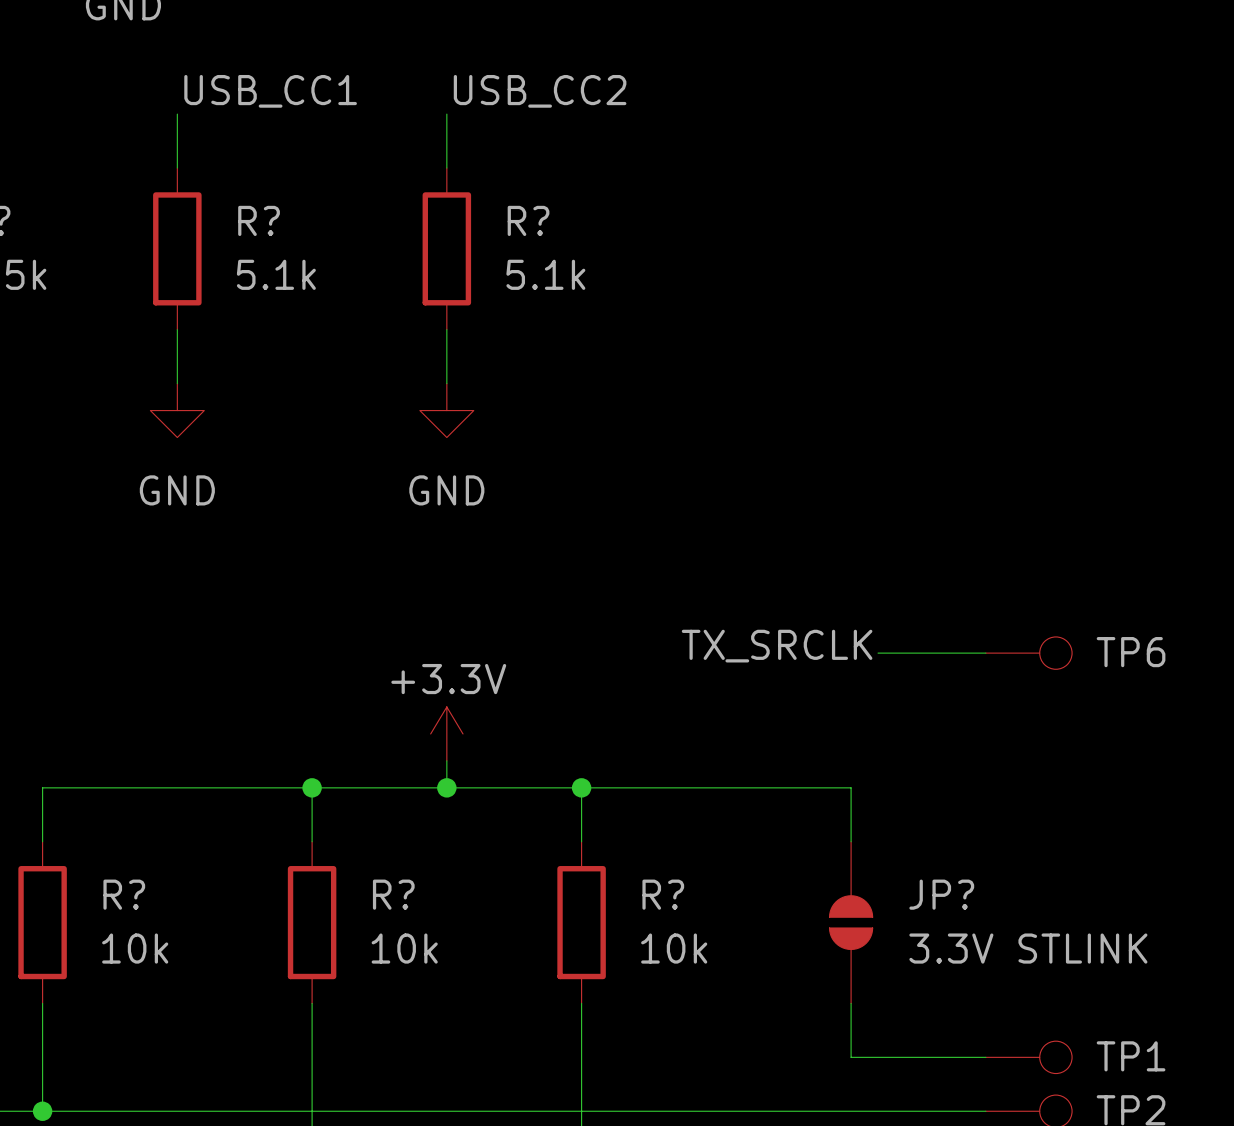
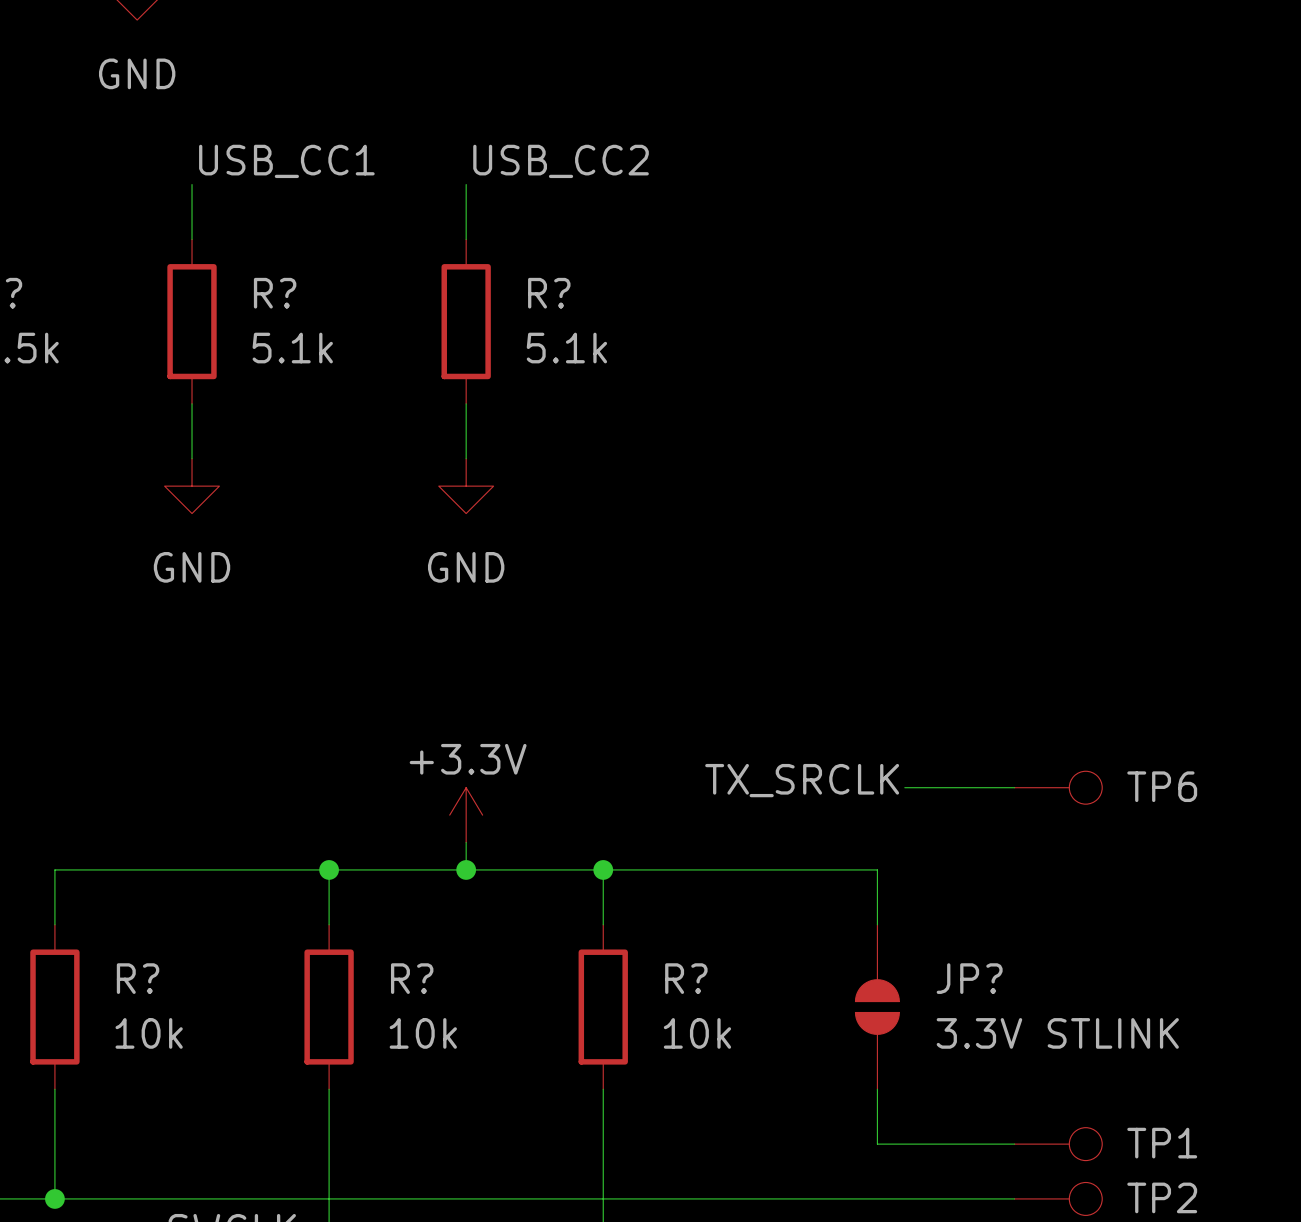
label position: TX_SRCLK (777, 646) -> TX_SRCLK (802, 780)
wire: (878, 653) (985, 653) -> (904, 787) (1014, 787)
TP6 position: (1028, 653) -> (1058, 787)

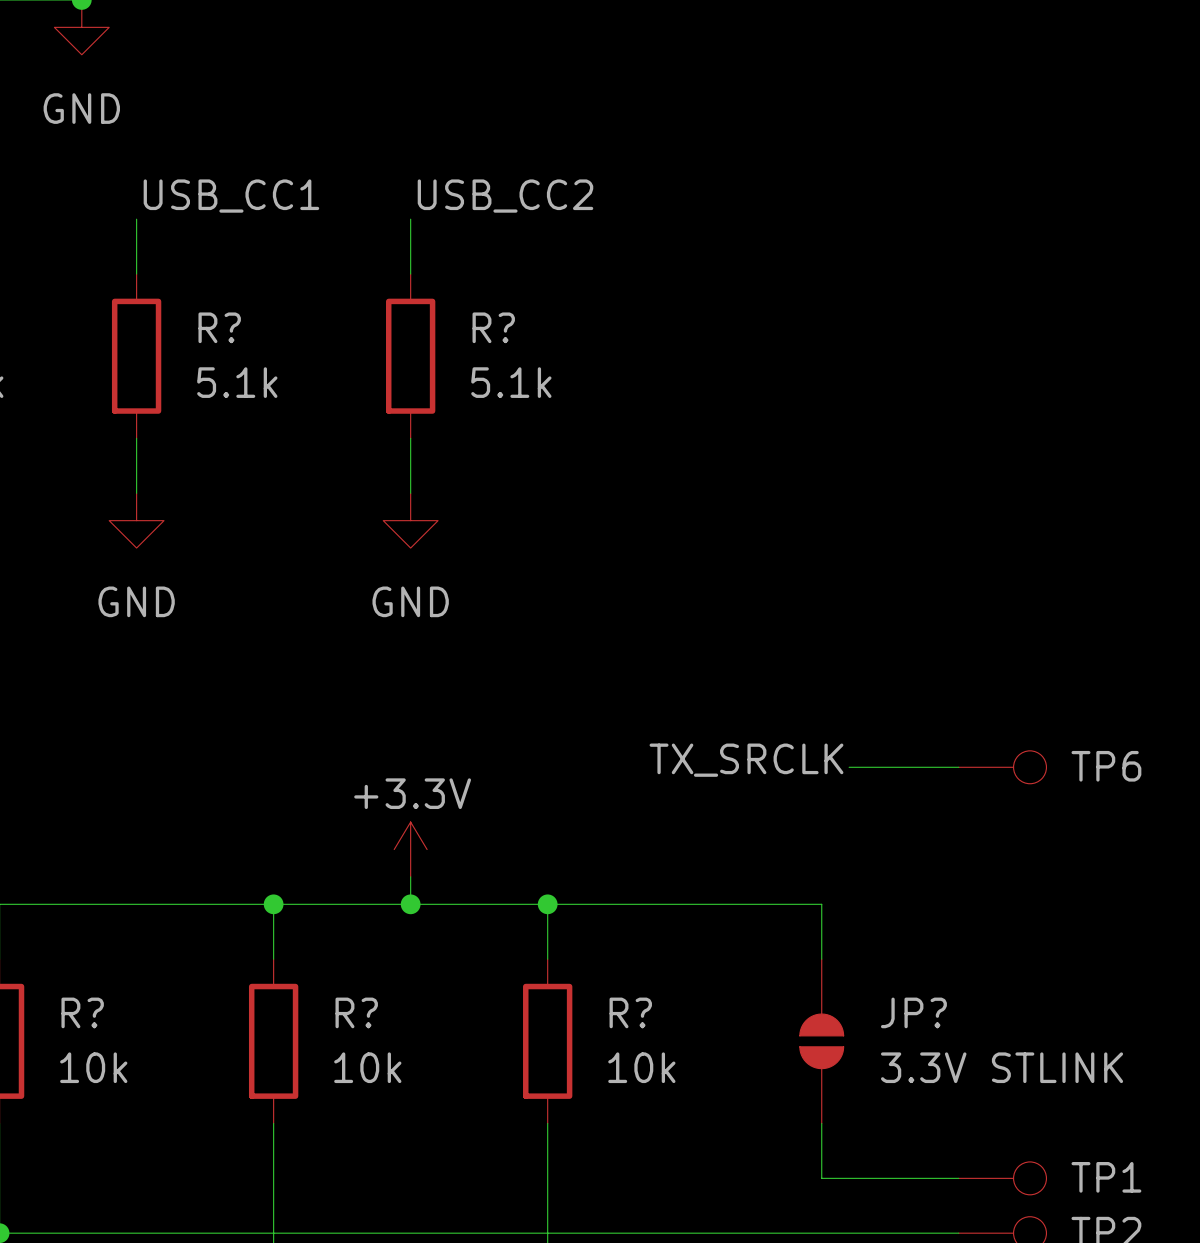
label position: TX_SRCLK (802, 780) -> TX_SRCLK (746, 760)
wire: (904, 787) (1014, 787) -> (849, 767) (958, 767)
TP6 position: (1058, 787) -> (1002, 767)

